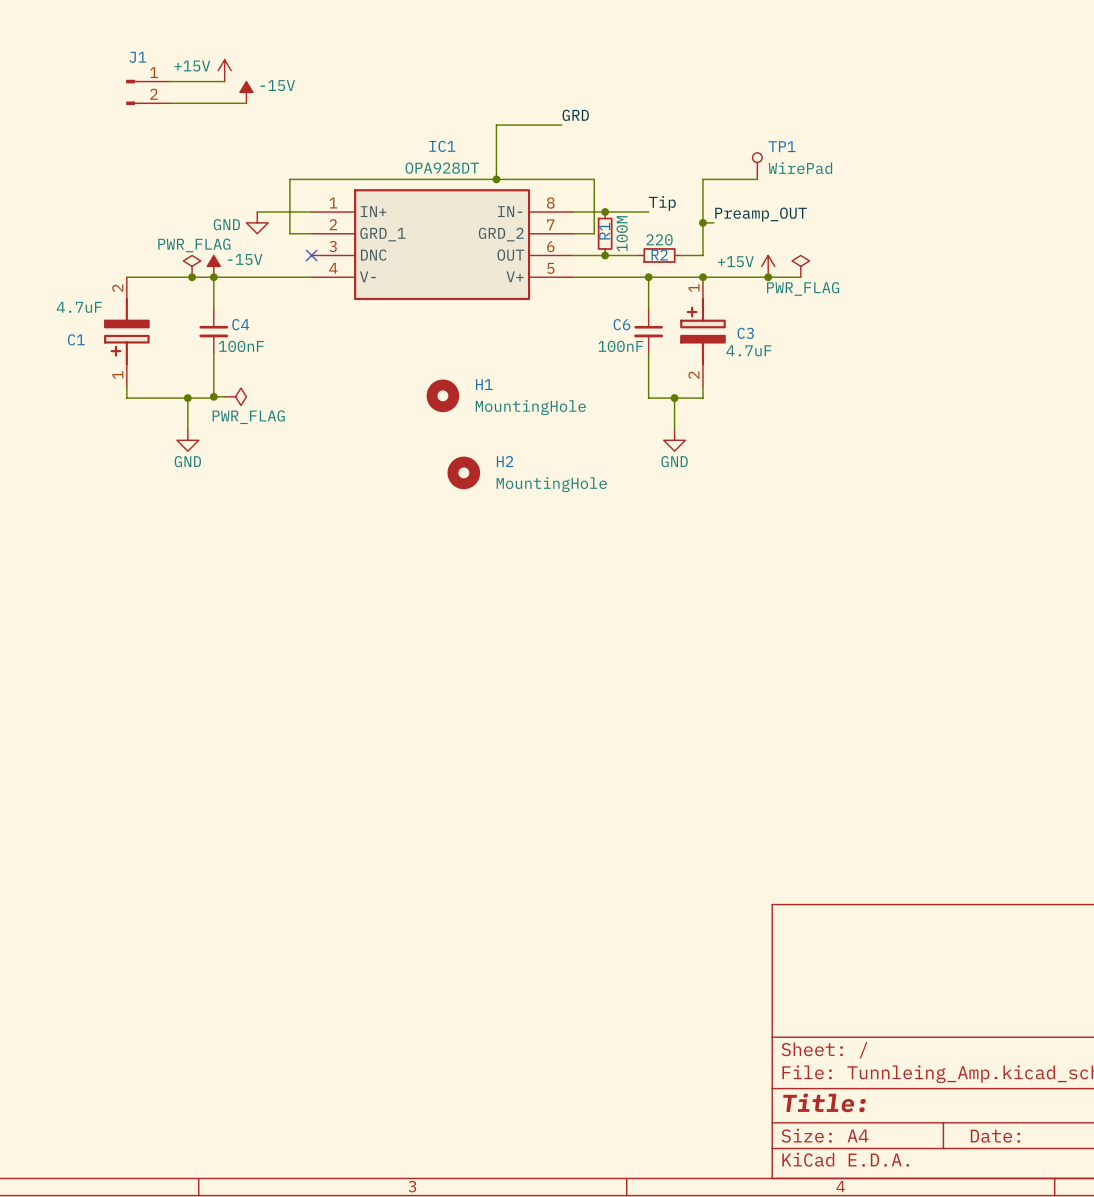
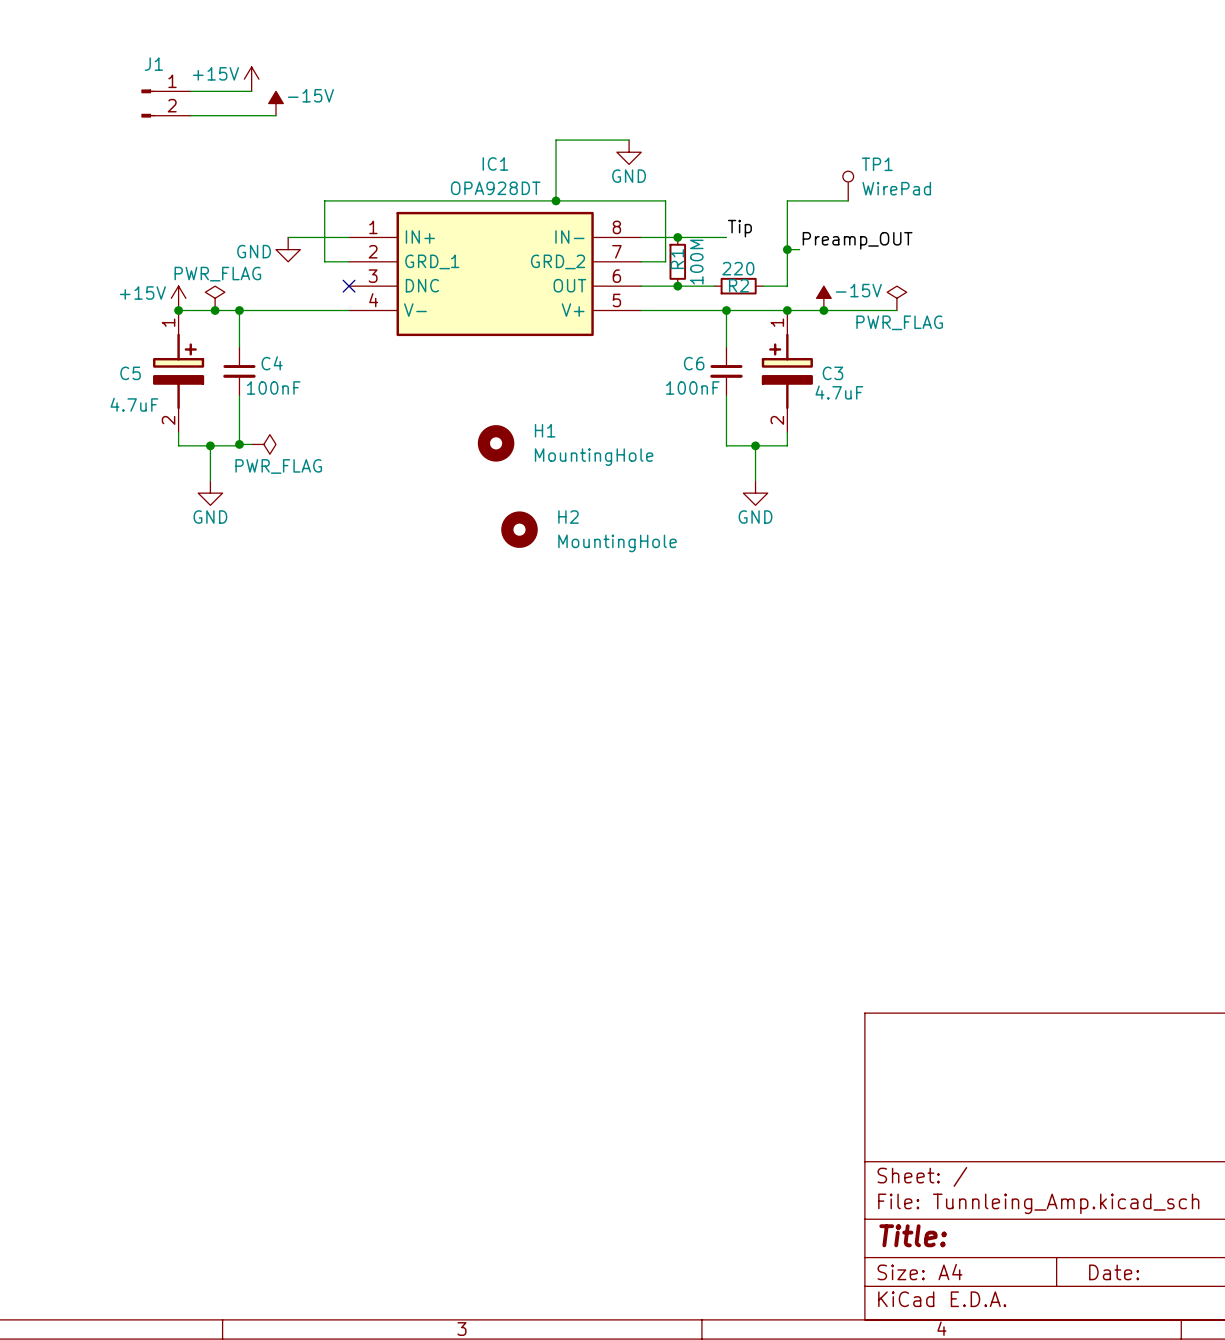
label: GRD (575, 115) -> none
power symbol: none -> GND (629, 152)
power symbol: none -> +15V (178, 298)
power symbol: -15V (213, 266) -> none
power symbol: none -> -15V (823, 298)
power symbol: +15V (768, 266) -> none
wire: (126, 277) (159, 277) -> none
junction: none -> (178, 310)
junction position: (768, 277) -> (823, 310)
C1: 4.7uF (126, 331) -> none
C5: none -> 4.7uF (178, 371)
wire: (126, 385) (126, 398) (159, 398) -> (178, 432) (178, 445)

